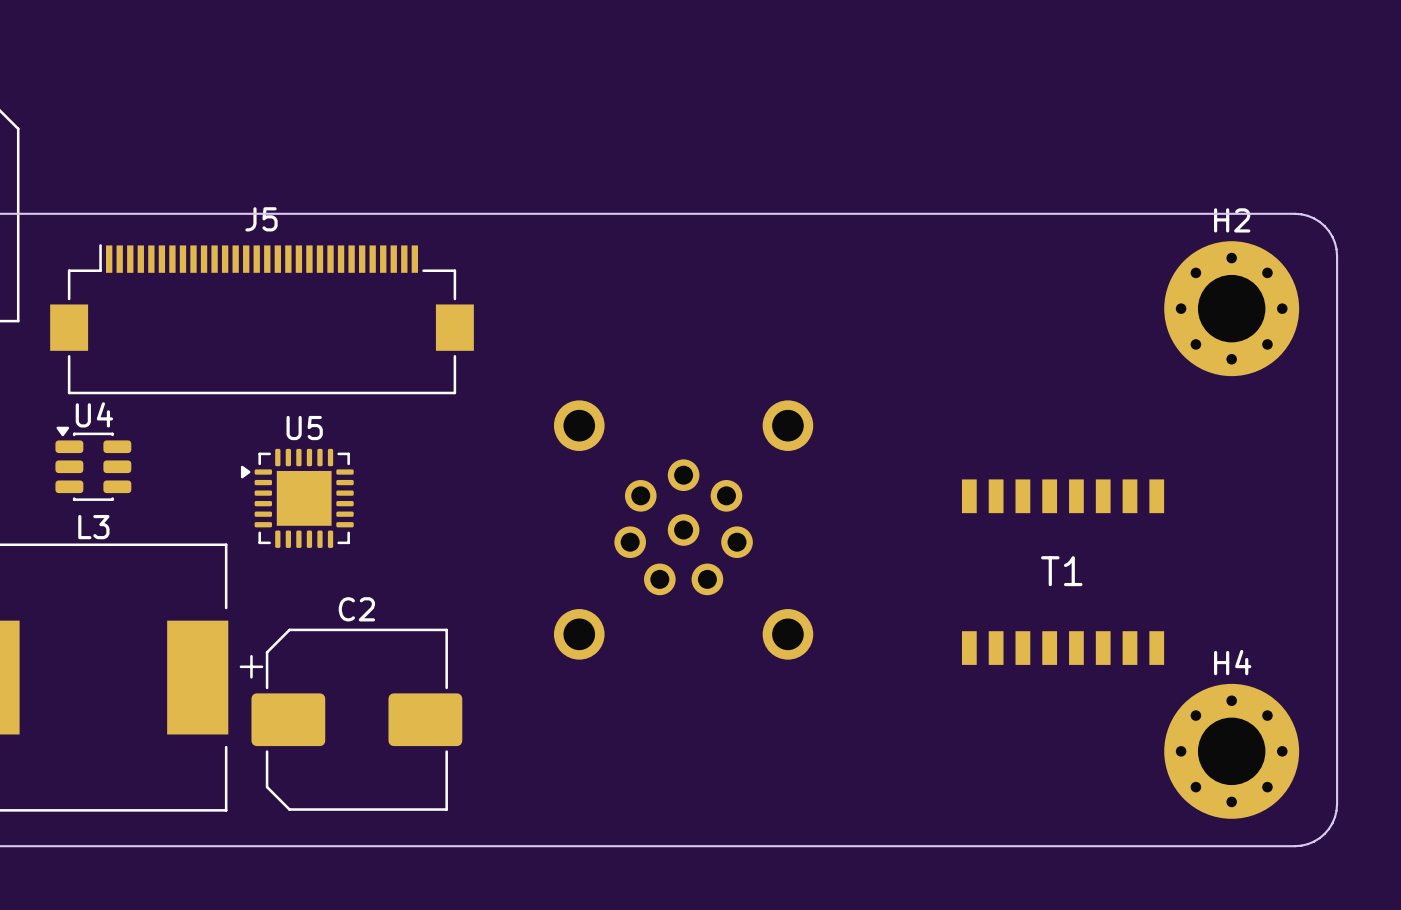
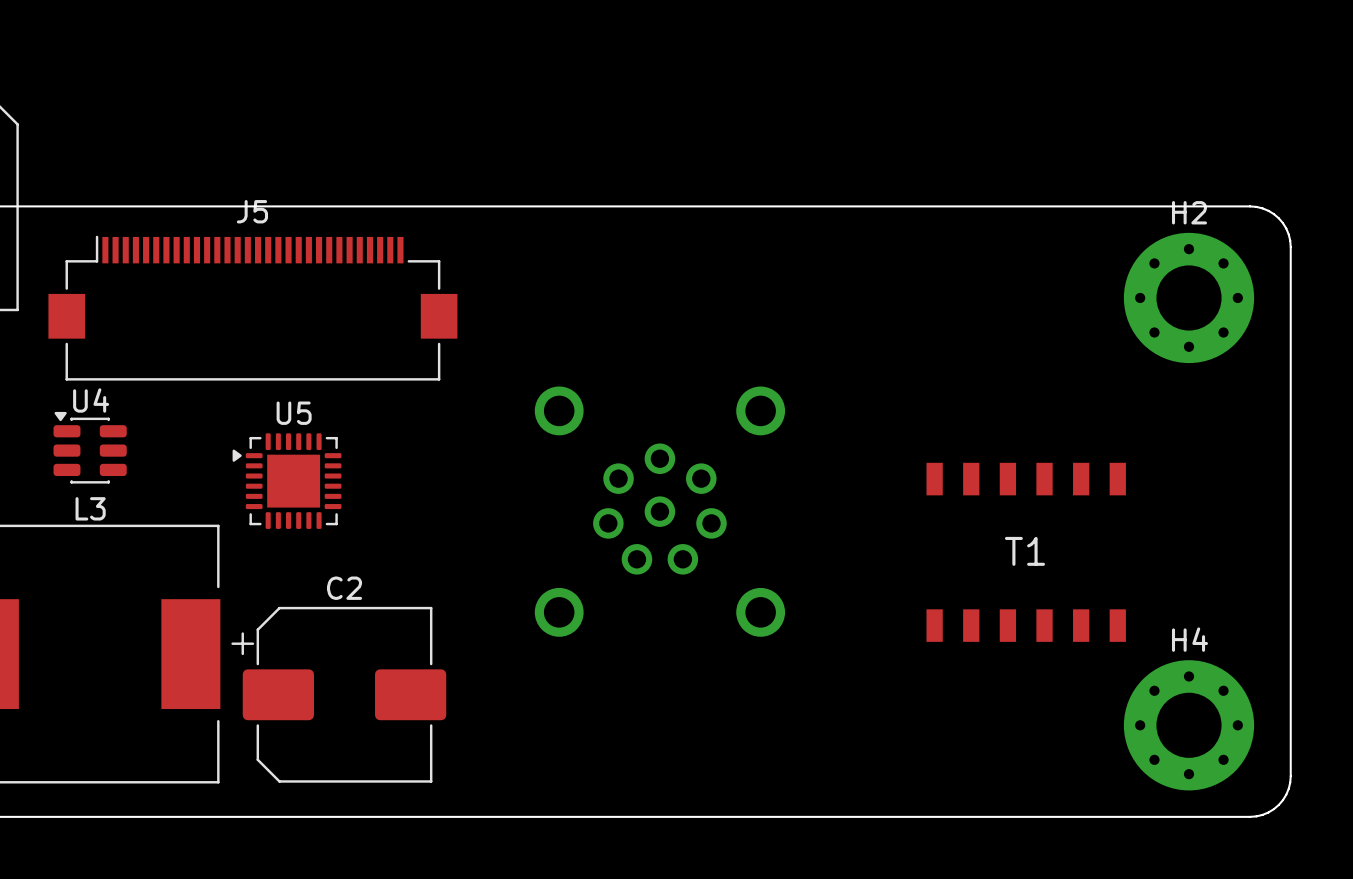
T1 footprint: [961, 479, 1165, 665] -> [926, 462, 1126, 642]

